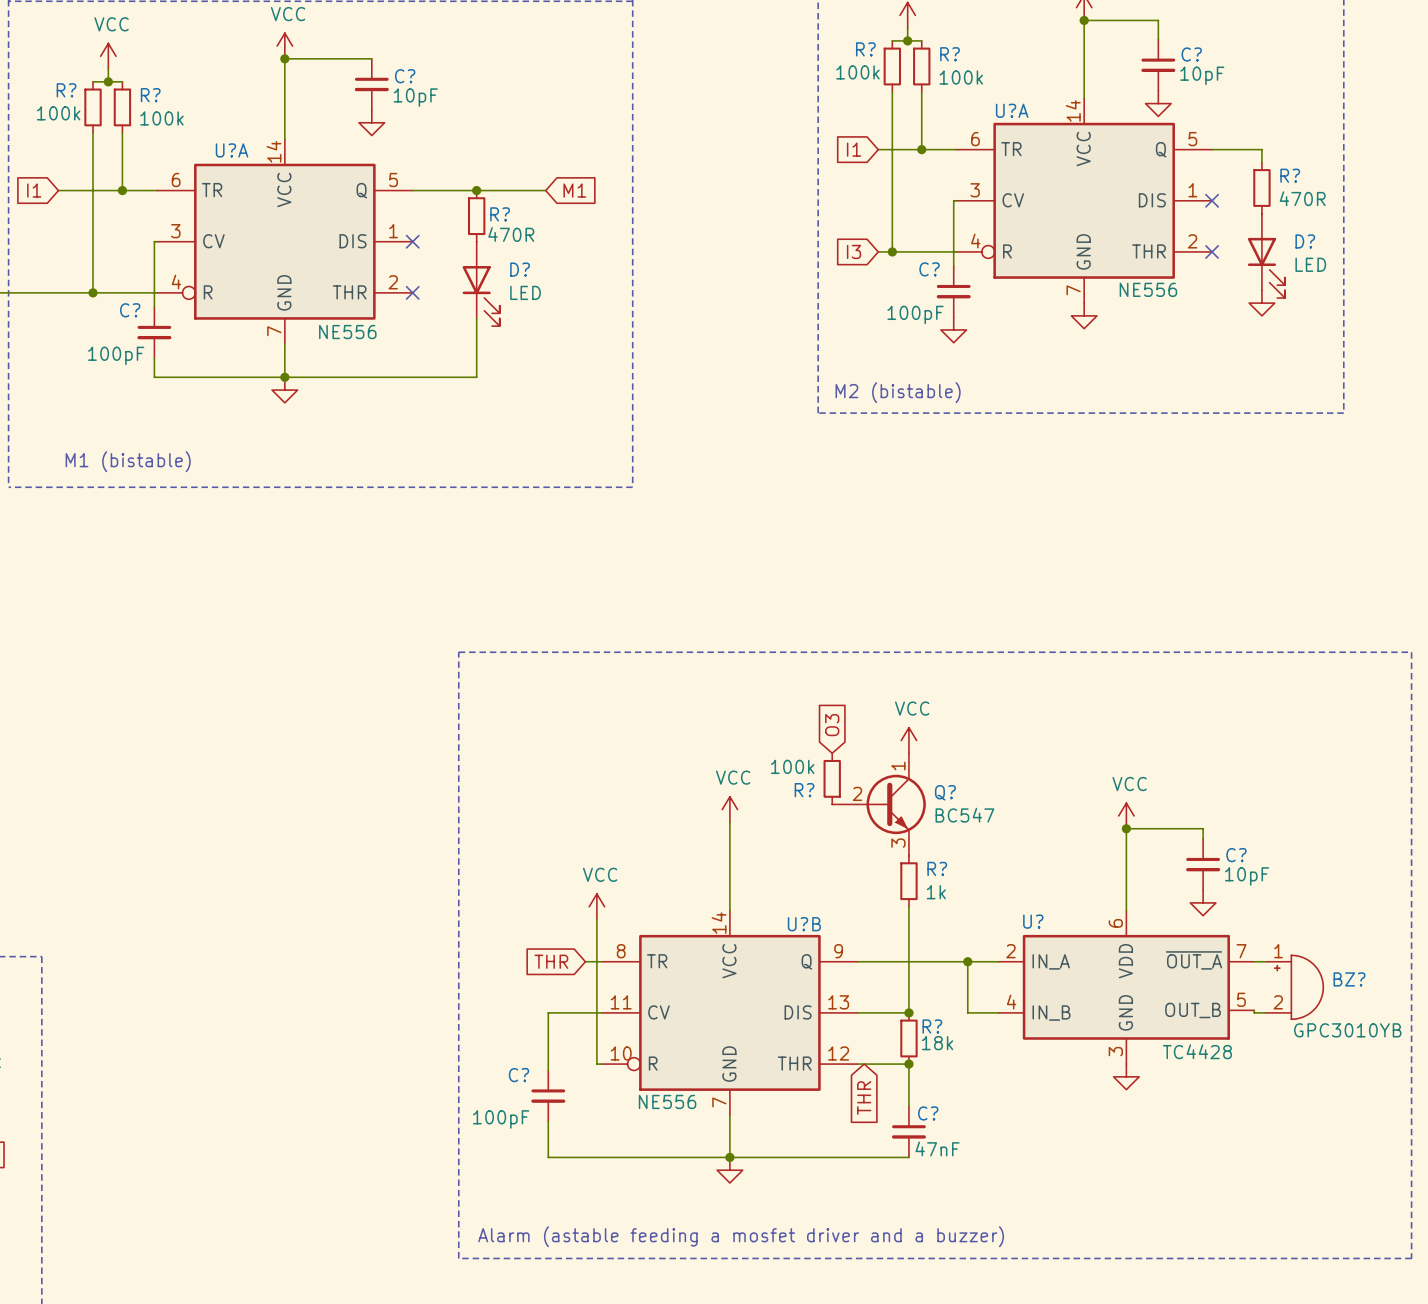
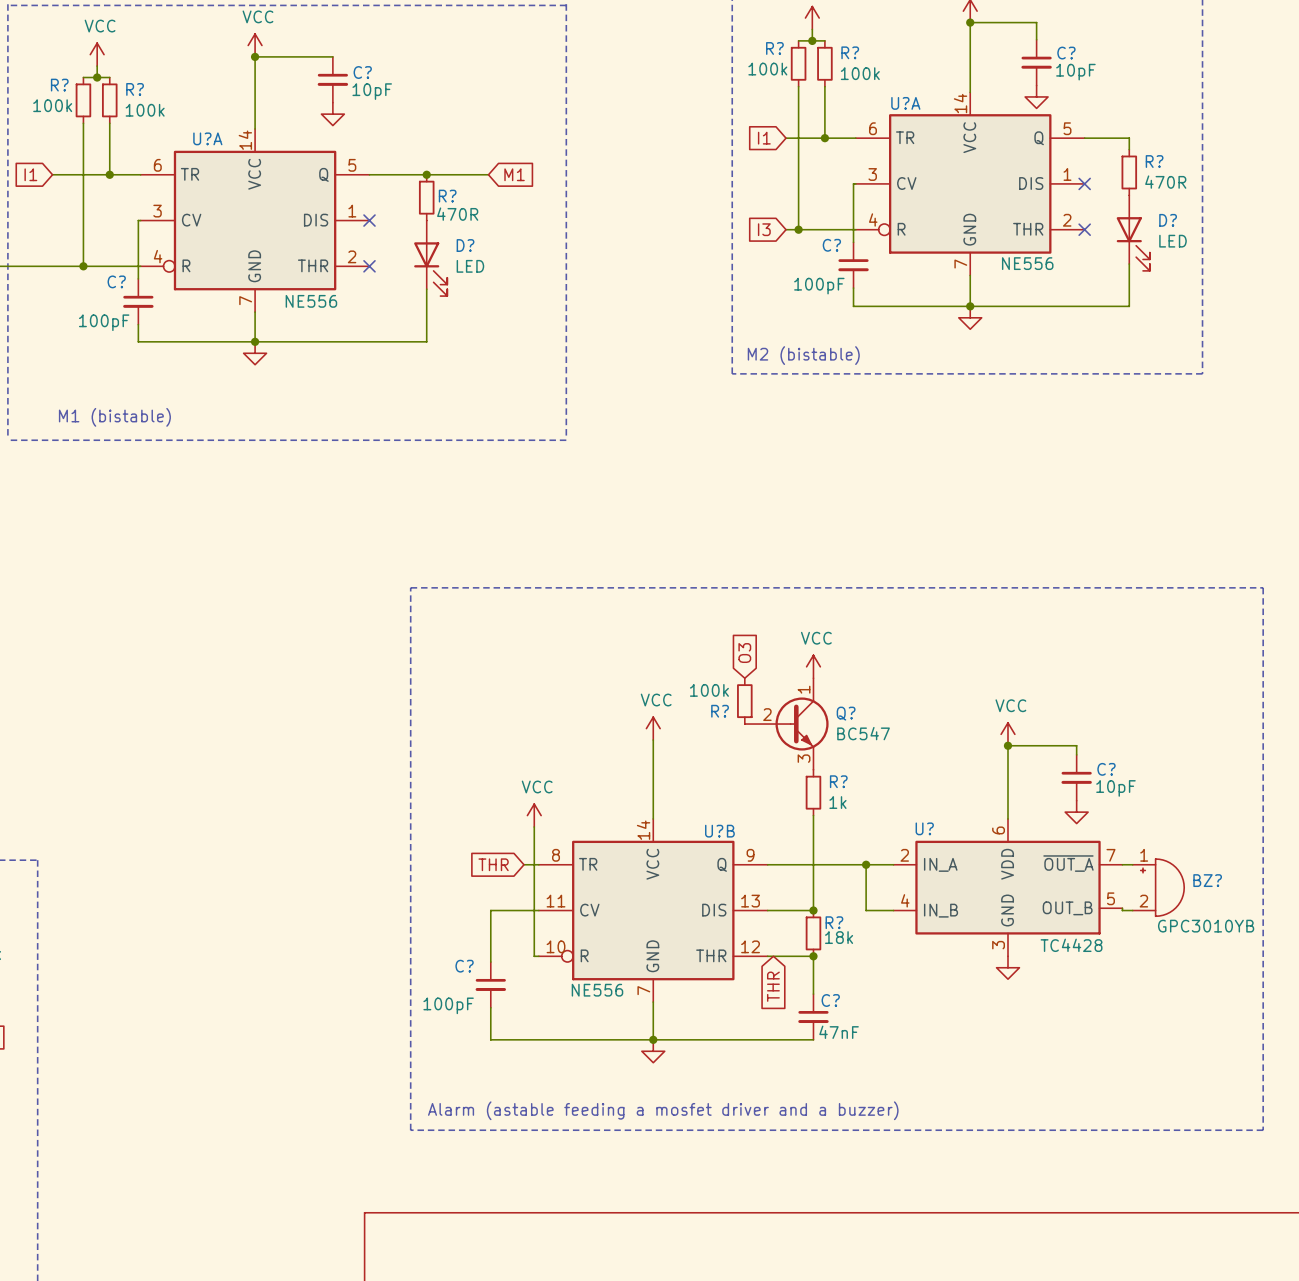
wire: none -> (1129, 264) (1129, 306) (853, 306) (853, 288)
wire: none -> (970, 275) (970, 306)
power symbol: (1261, 303) -> none
power symbol position: (1084, 315) -> (970, 317)
power symbol: (953, 329) -> none
junction: none -> (970, 306)

